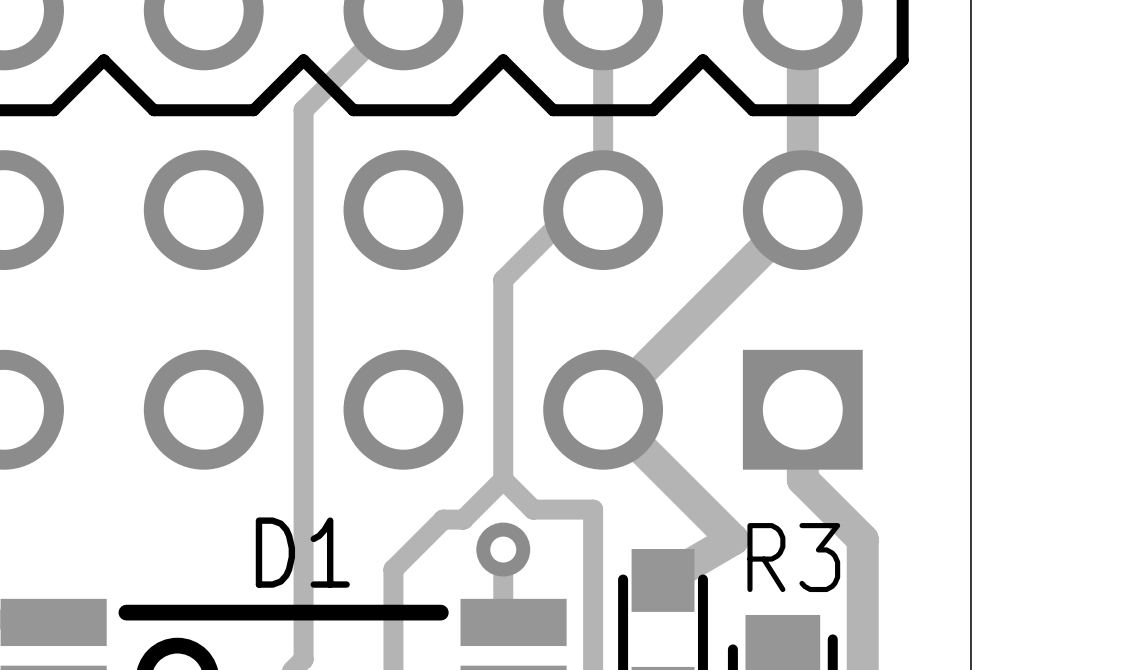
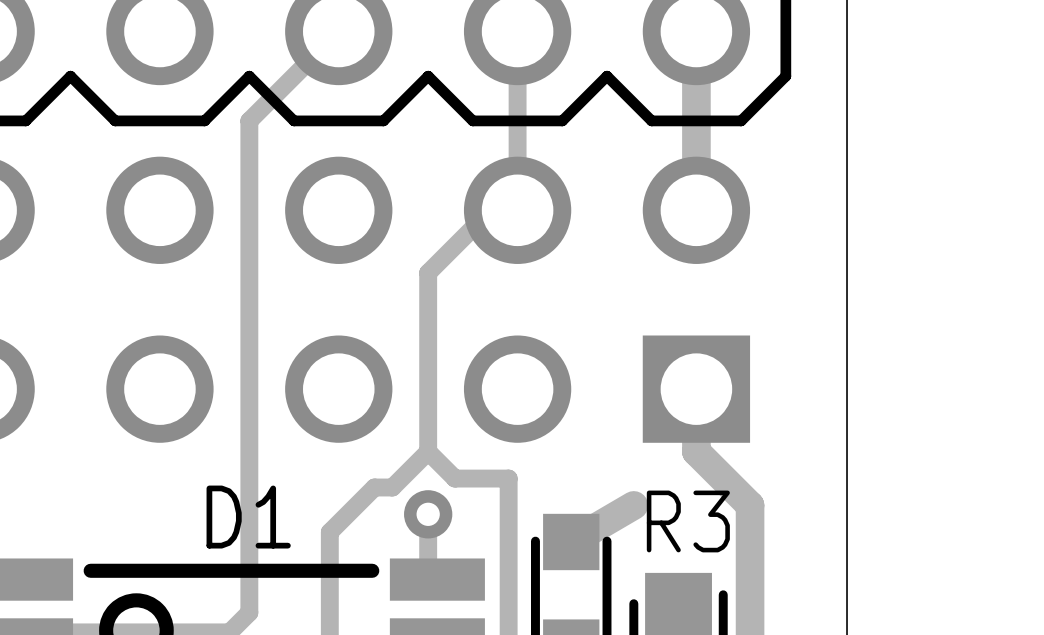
track: (802, 210) (603, 409) (732, 539) -> none

